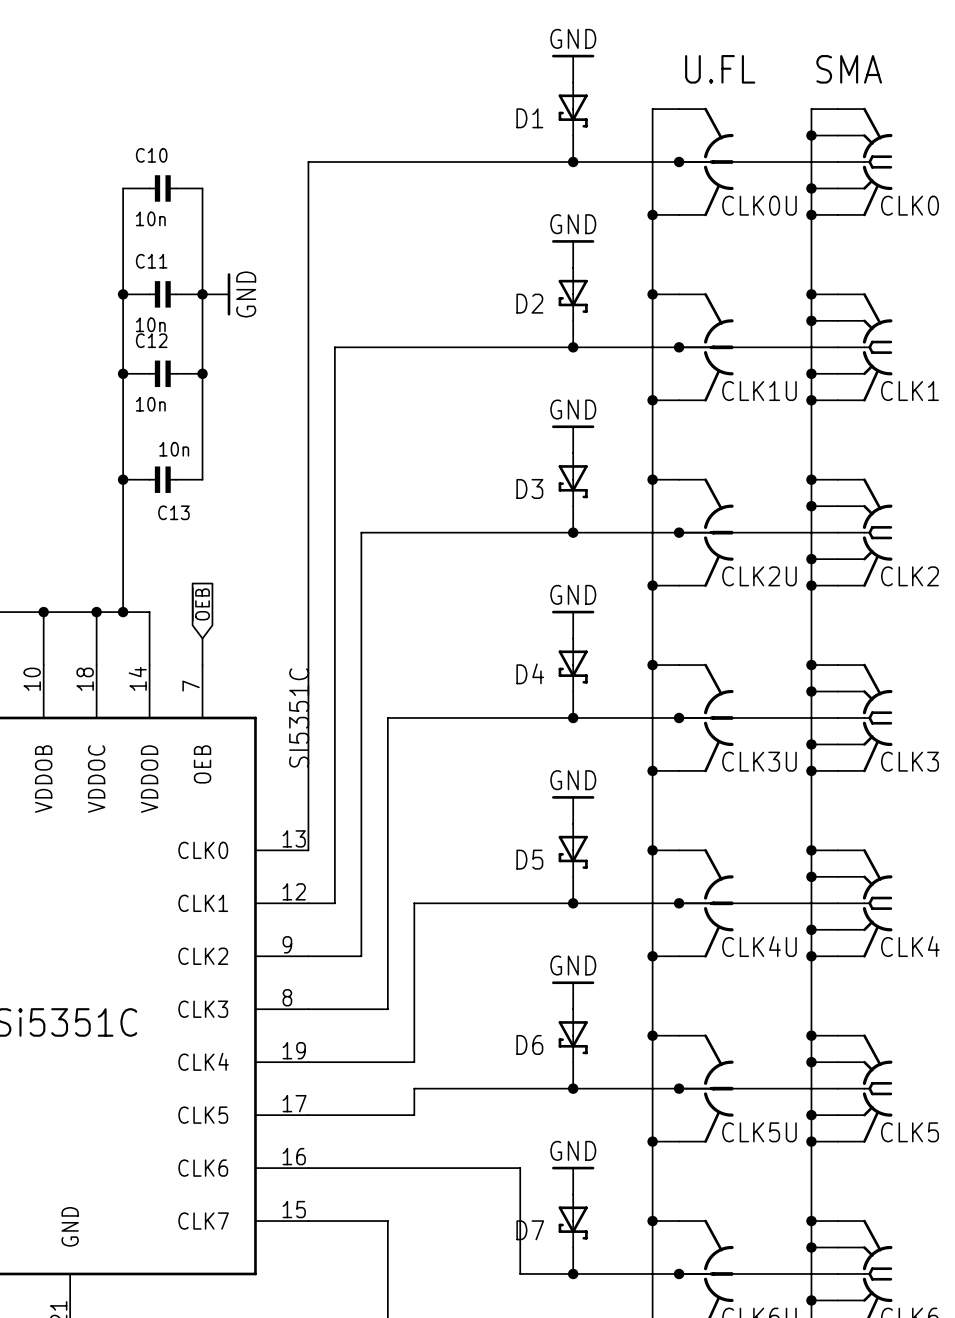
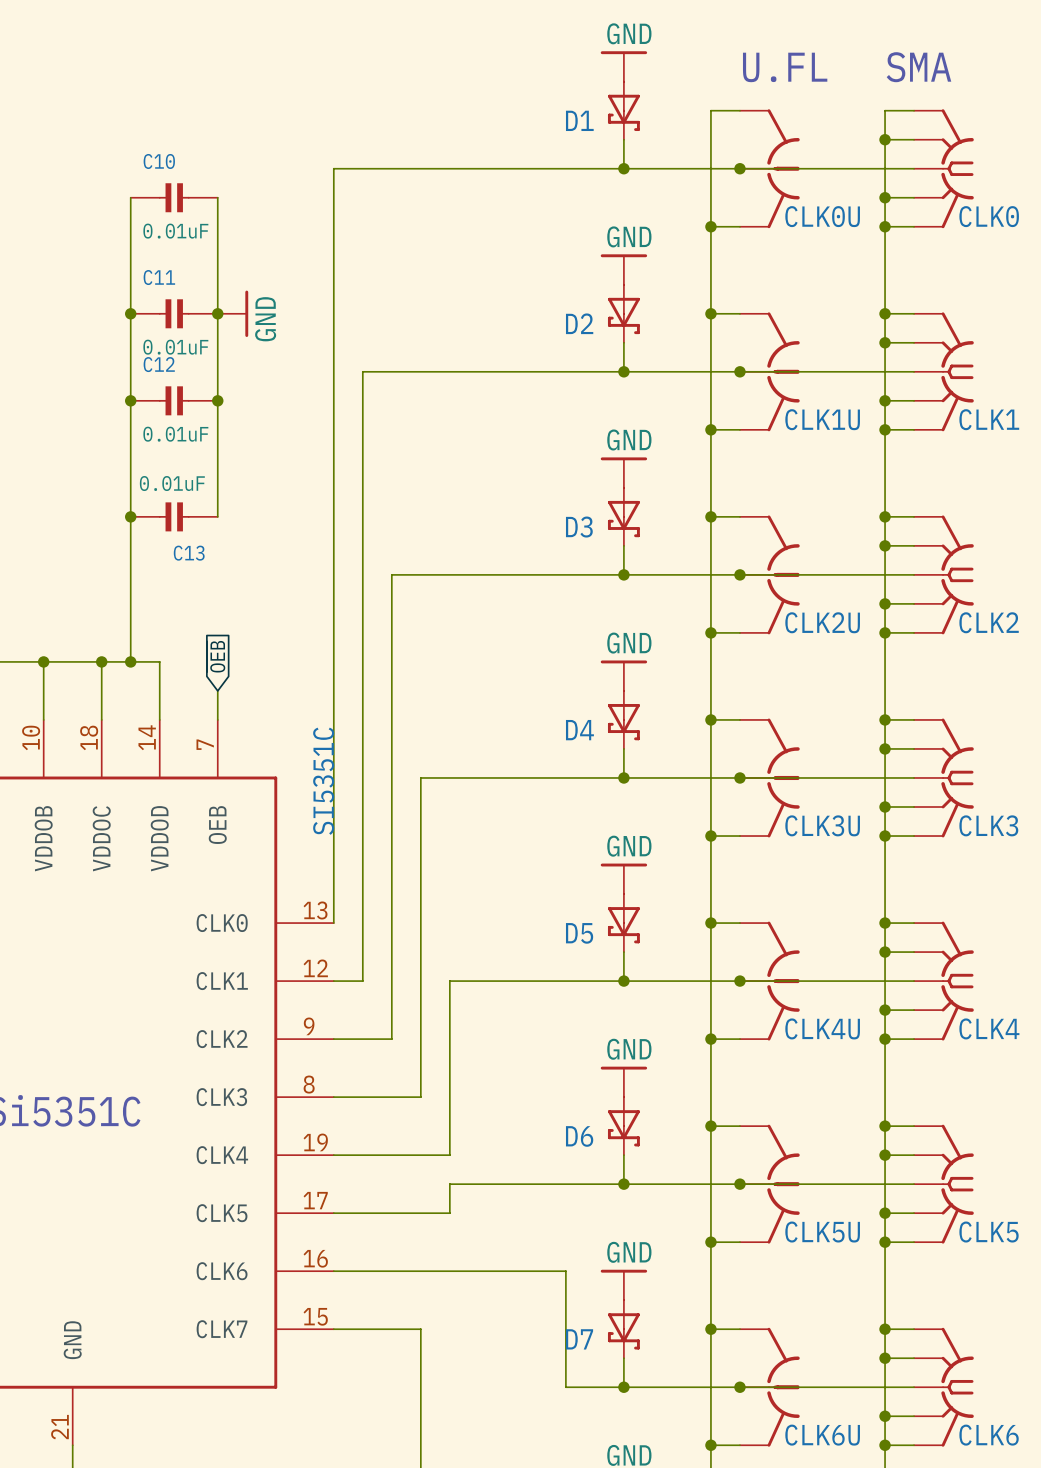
C10 value: 10n (150, 218) -> 0.01uF (175, 231)
C11 value: 10n (150, 324) -> 0.01uF (175, 347)
C12 value: 10n (150, 404) -> 0.01uF (175, 434)
C13 value: 10n (174, 449) -> 0.01uF (172, 483)

